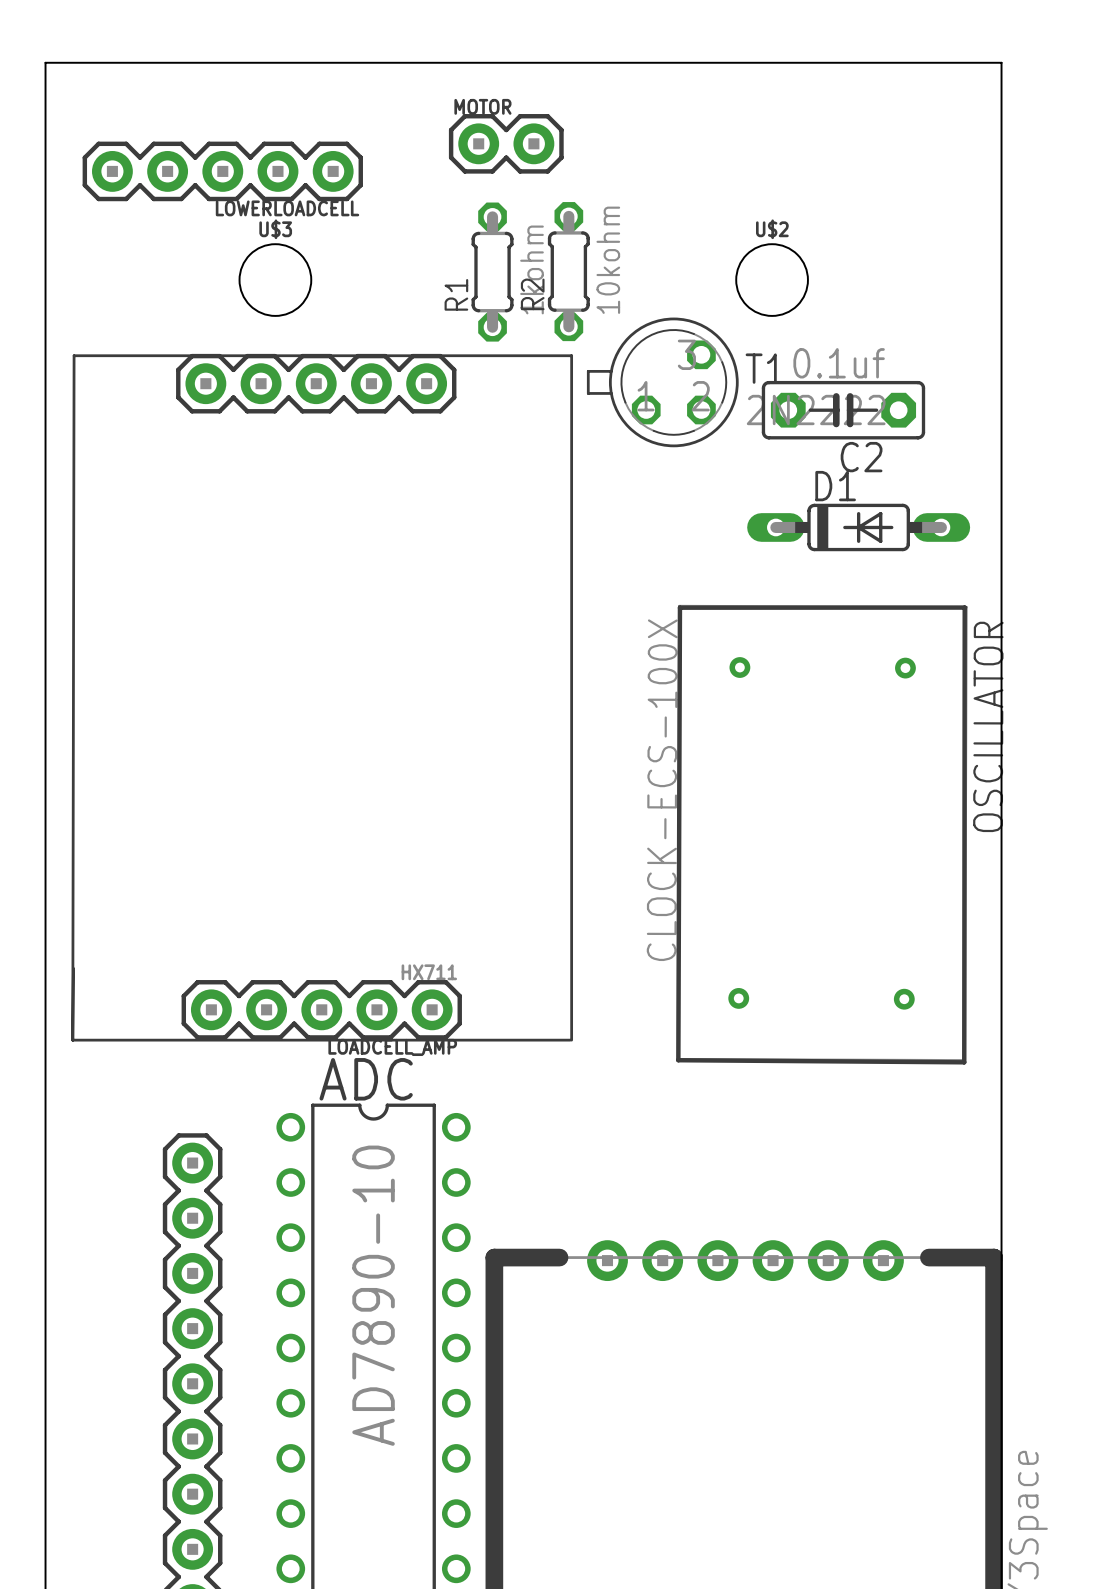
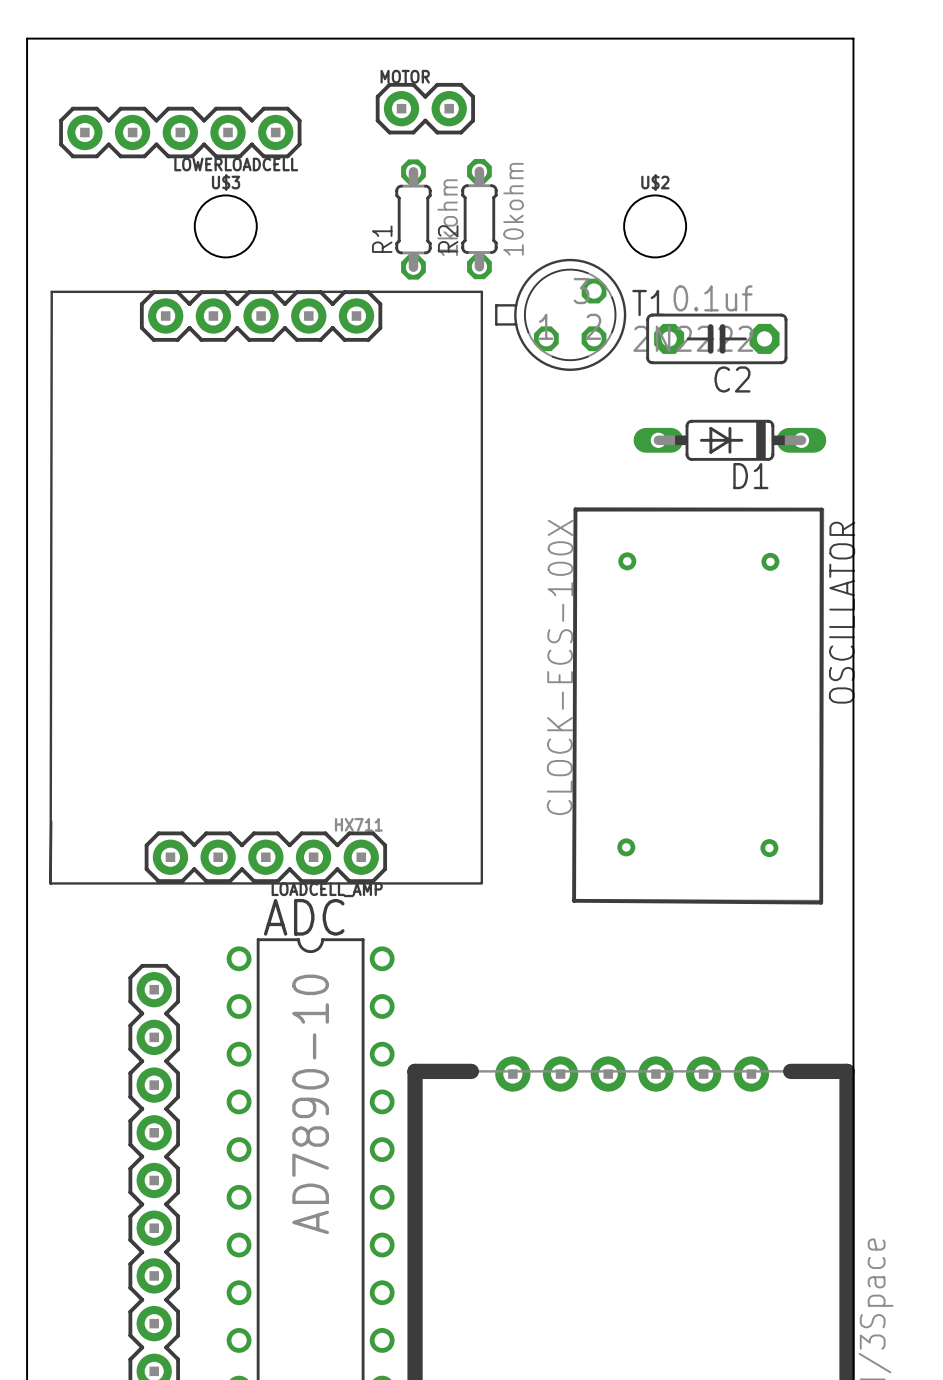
D1 rotation: 0° (858, 527) -> 180° (729, 440)

